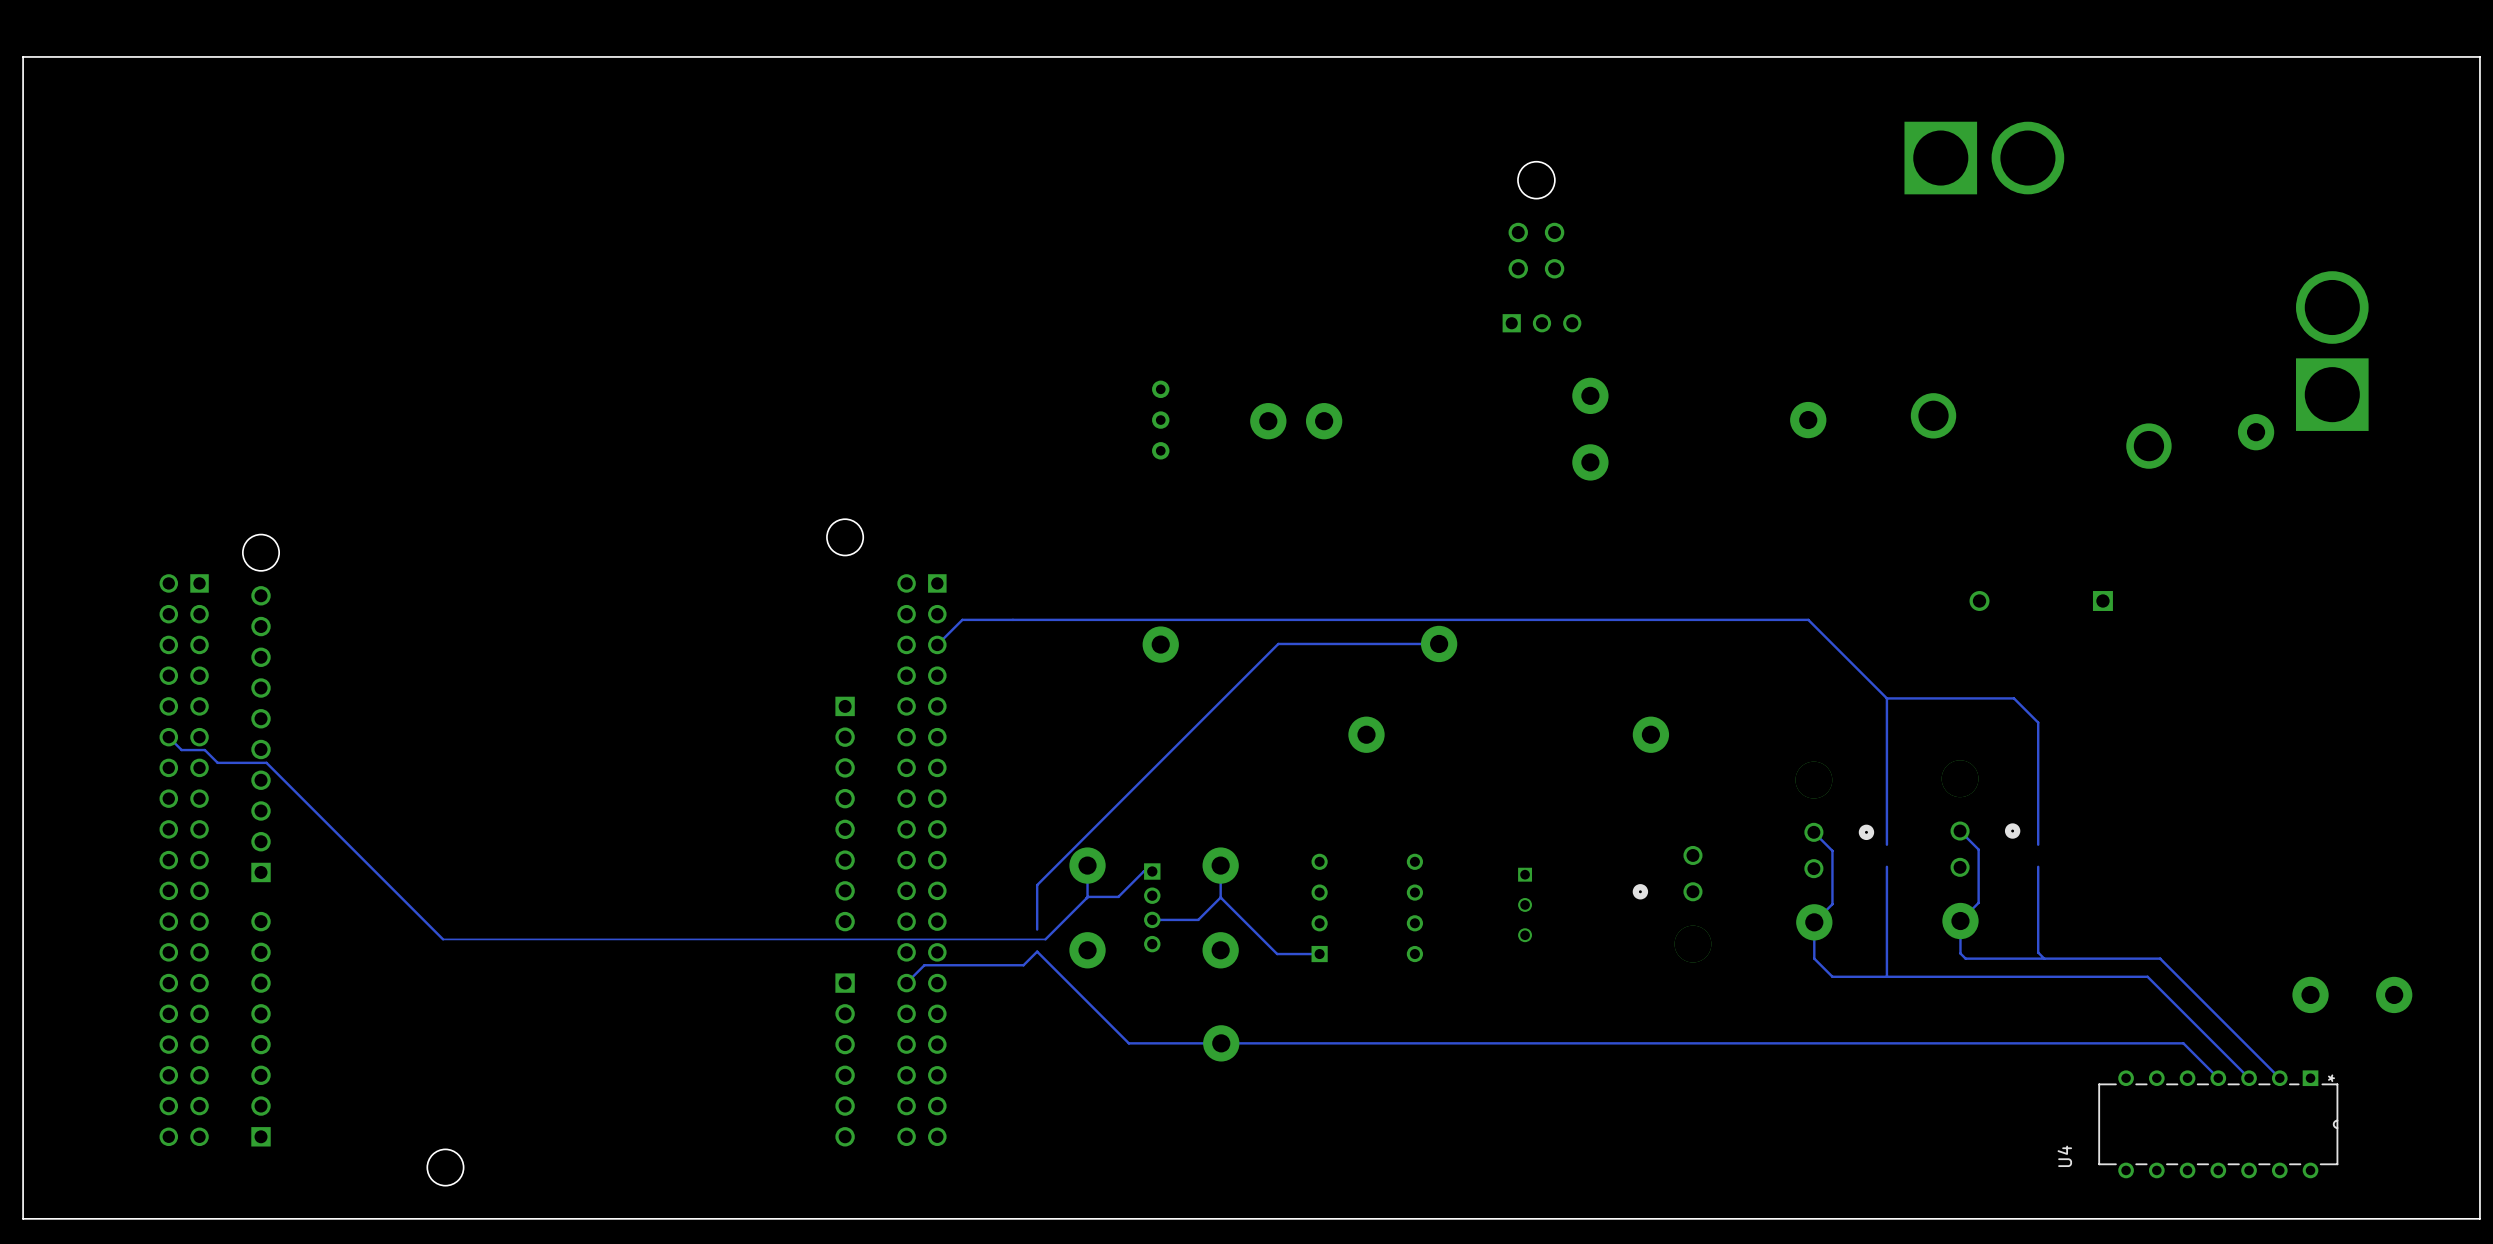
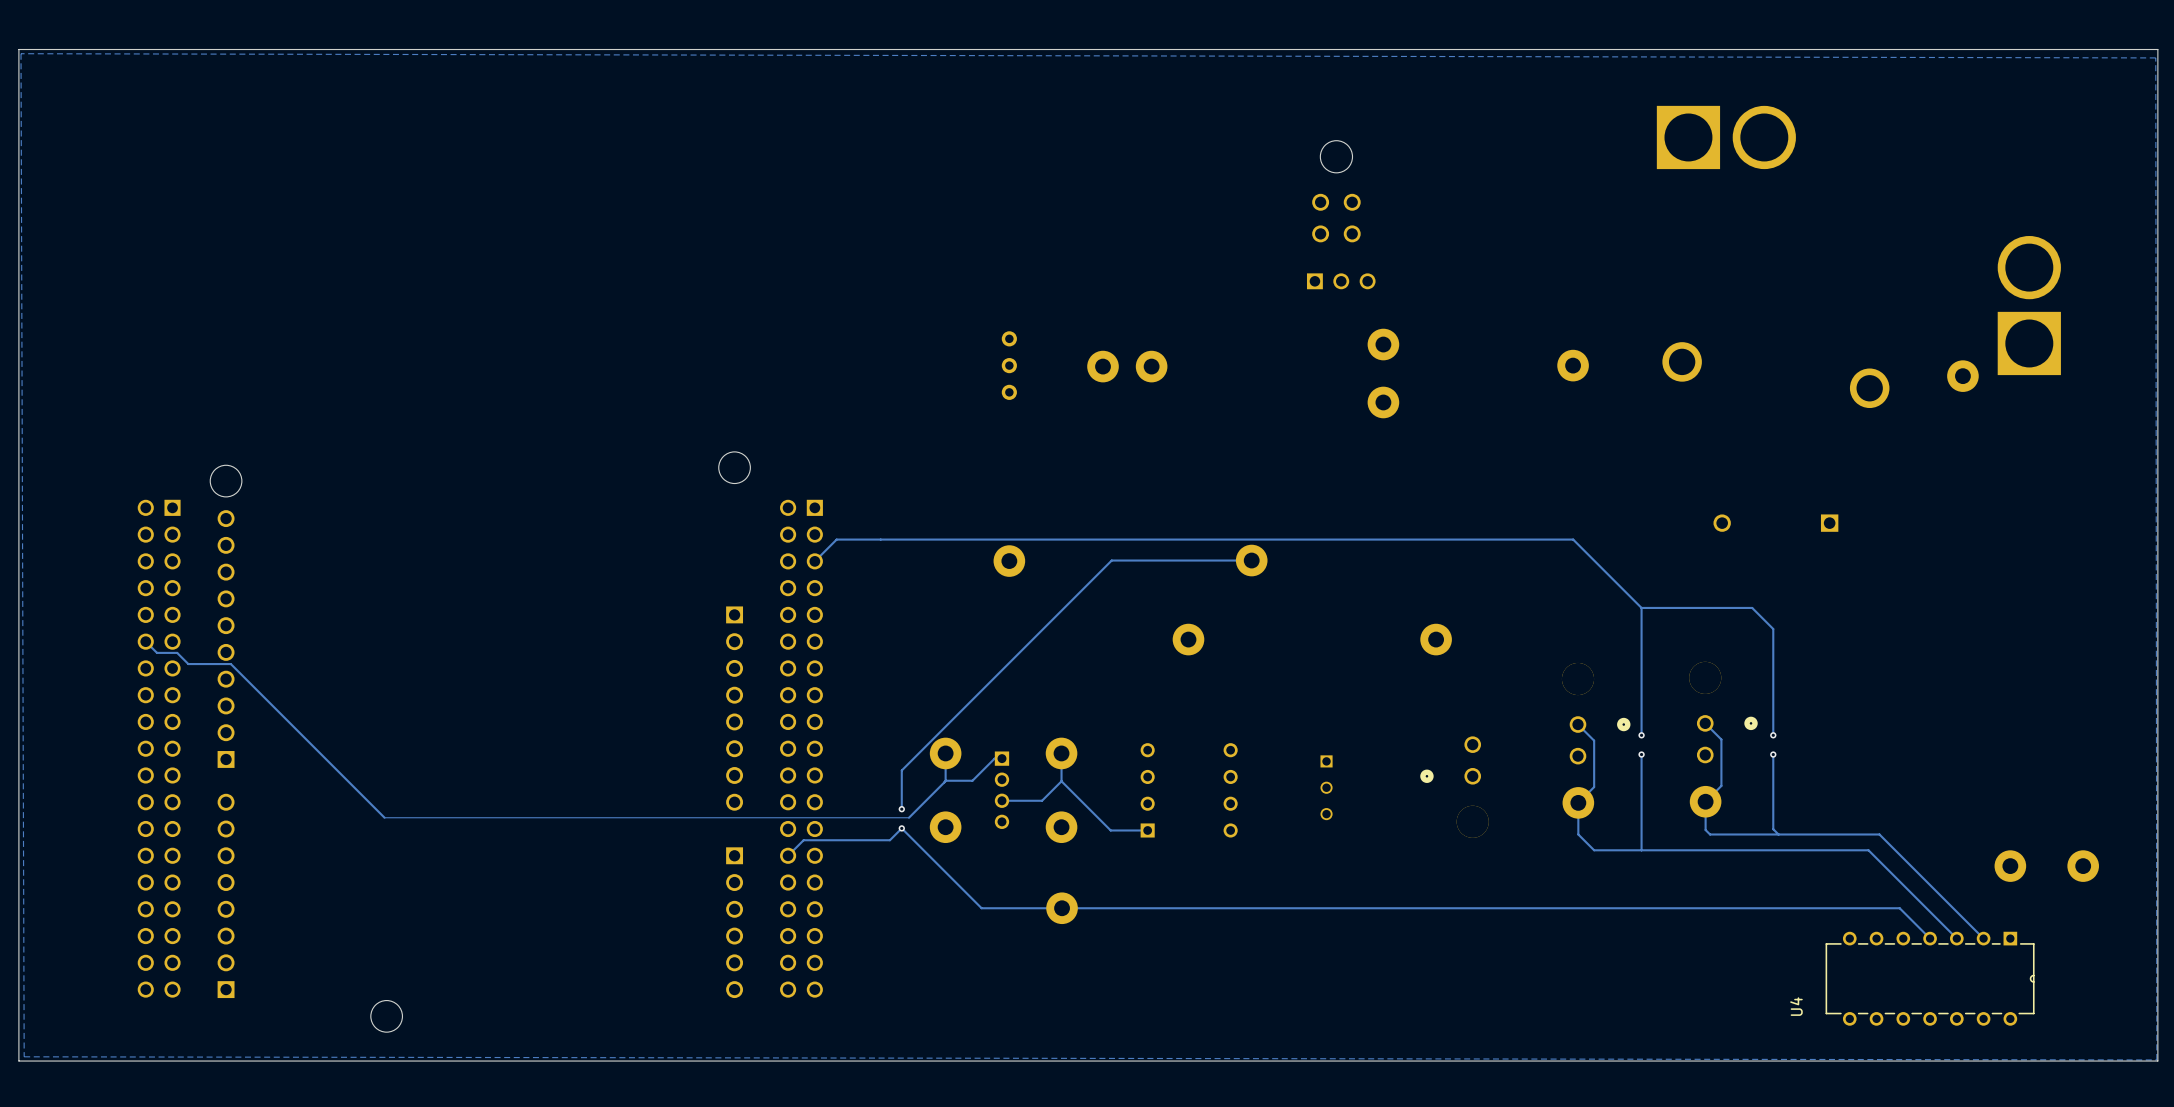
zone outline: none -> (21, 53) (2155, 57) (2156, 1059) (24, 1056) (21, 53)
via: none -> (1641, 735)
via: none -> (1773, 735)
via: none -> (1641, 754)
via: none -> (1773, 754)
via: none -> (901, 809)
via: none -> (901, 828)
U4 text: * (2331, 1078) -> none

